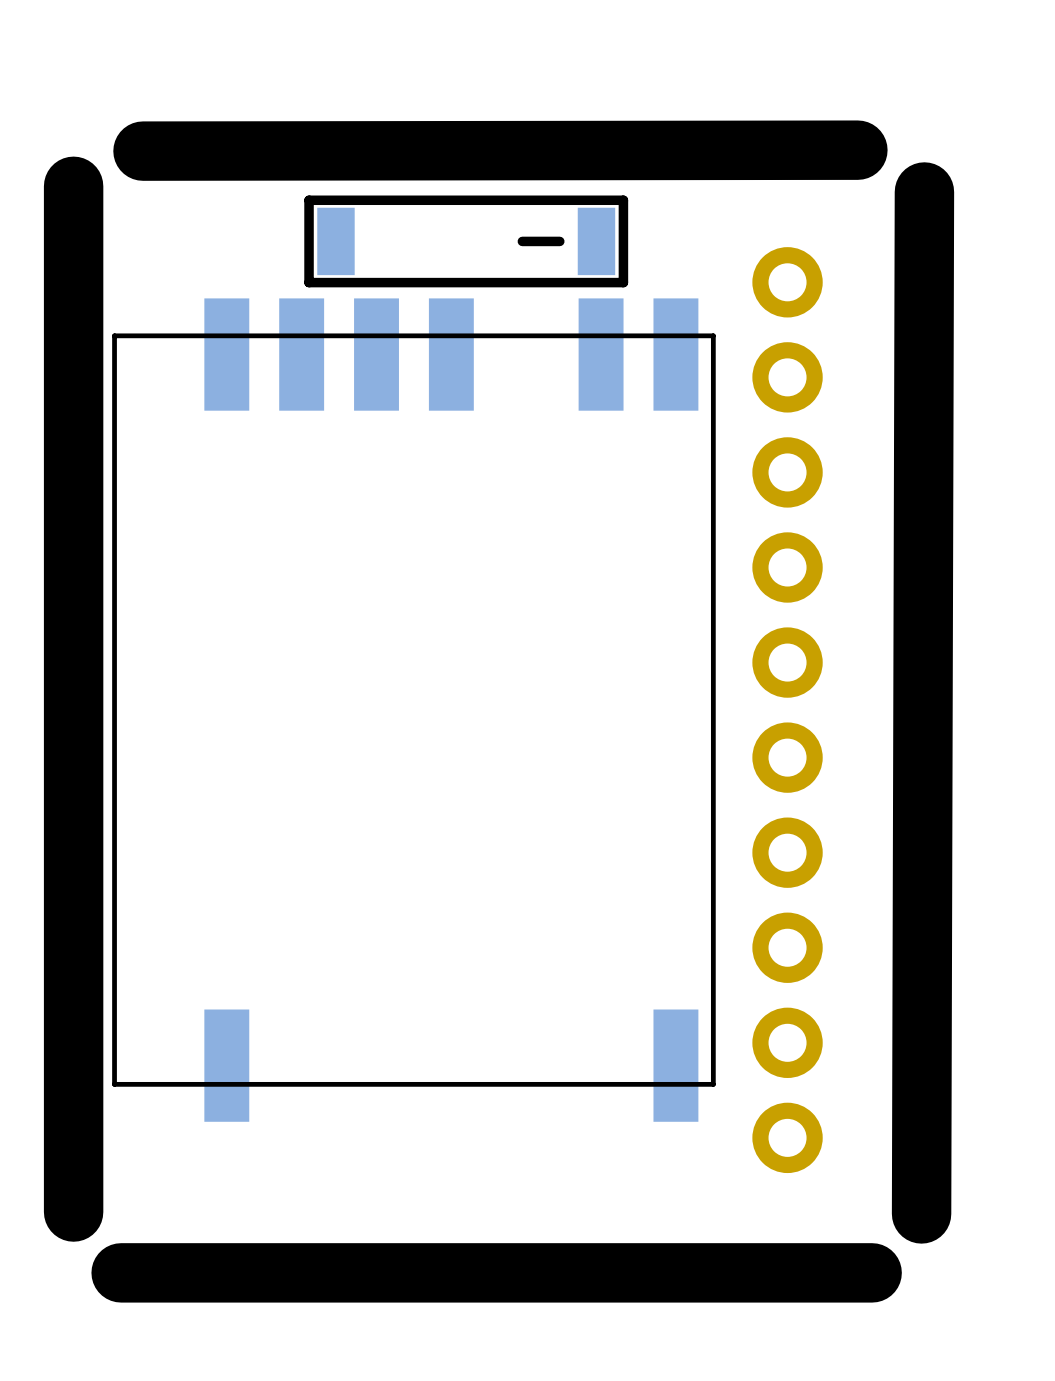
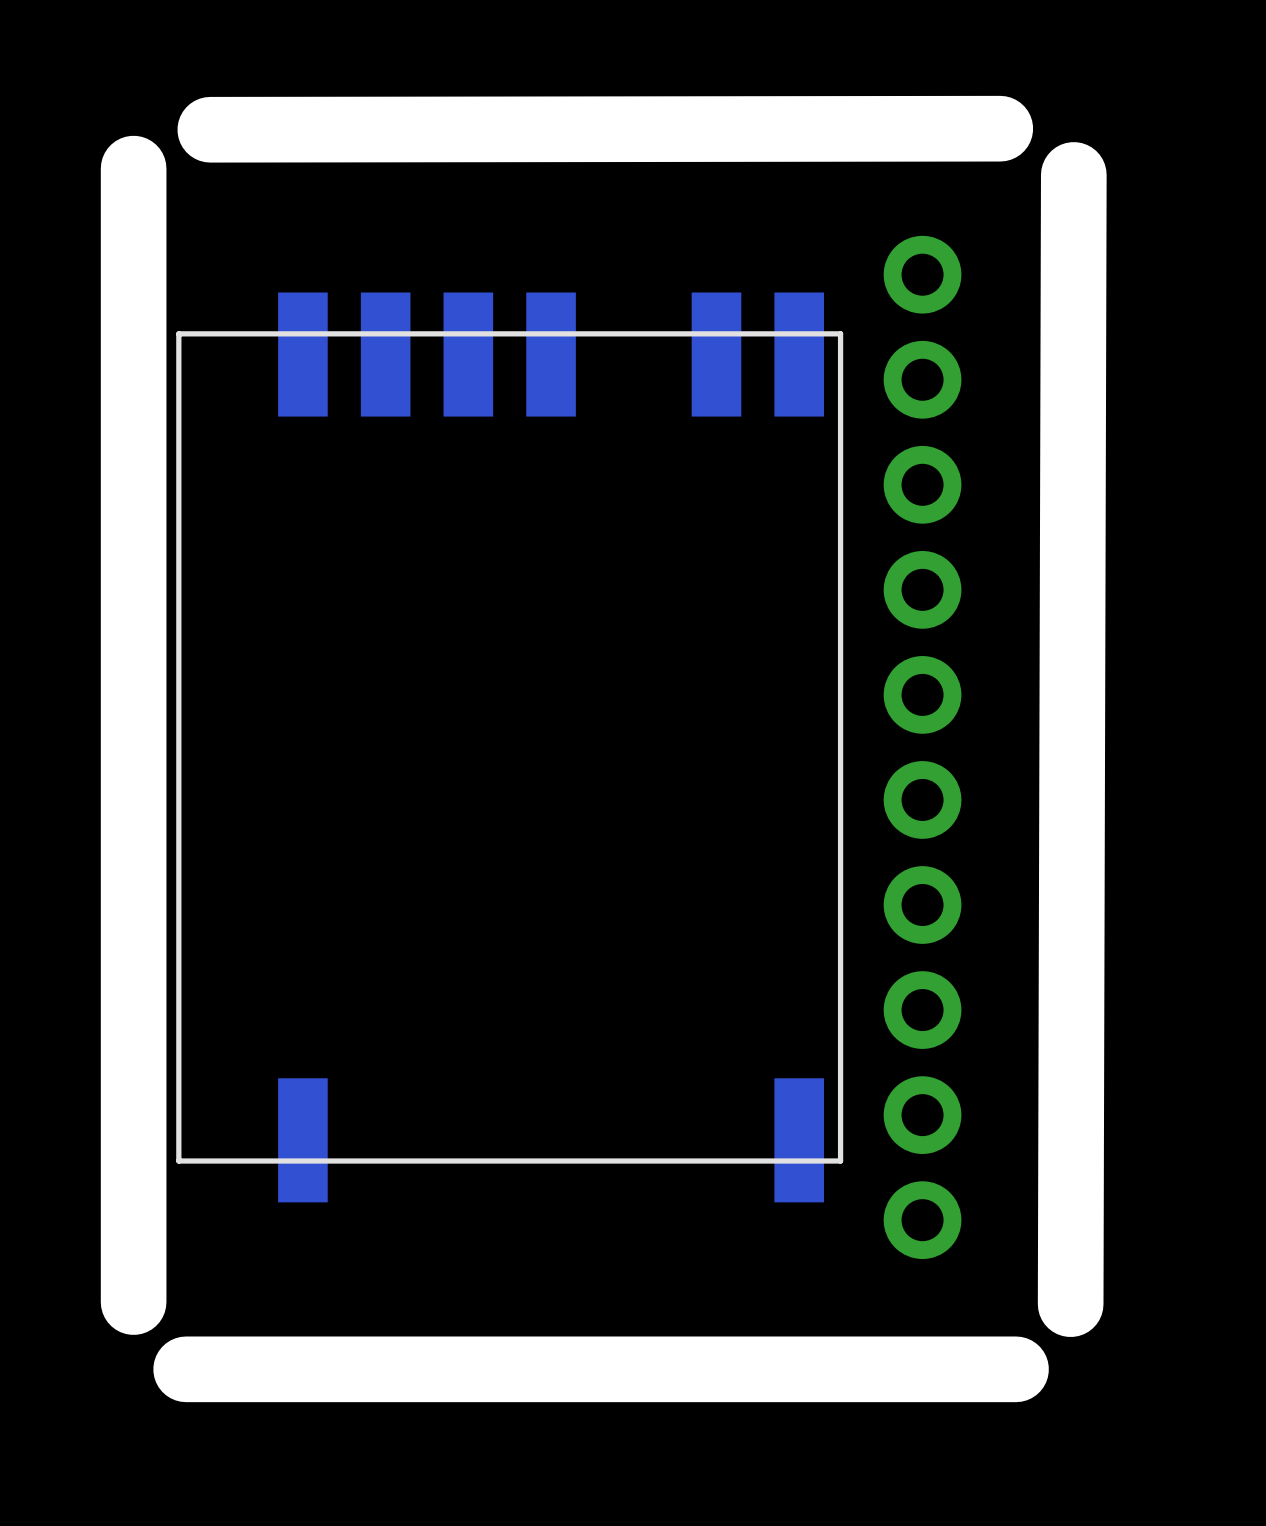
part: (466, 241) -> none

